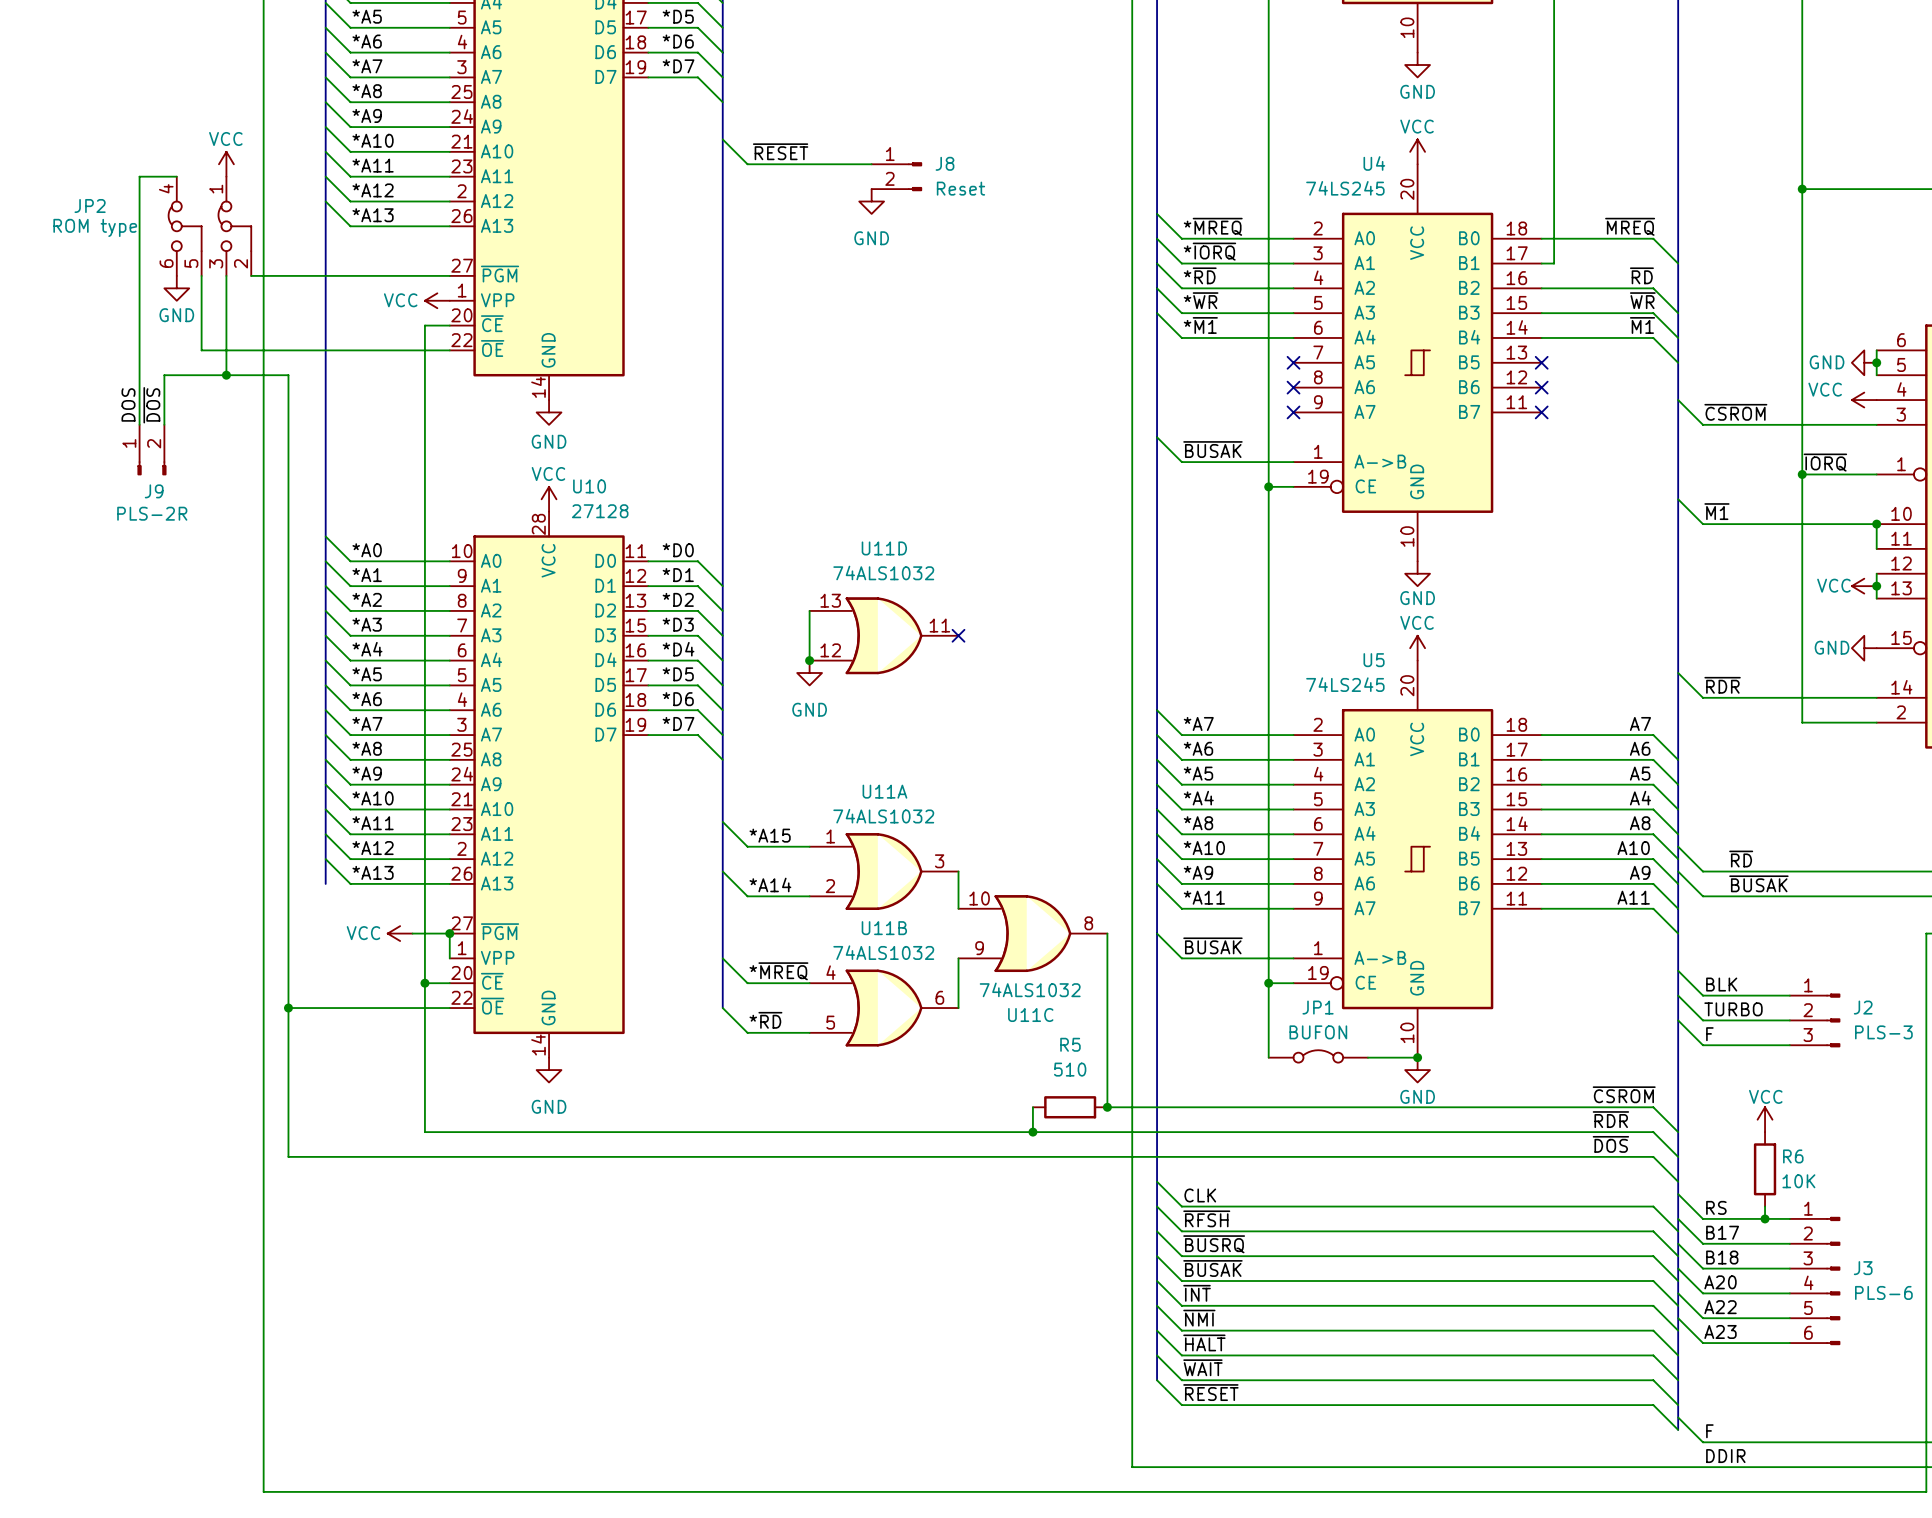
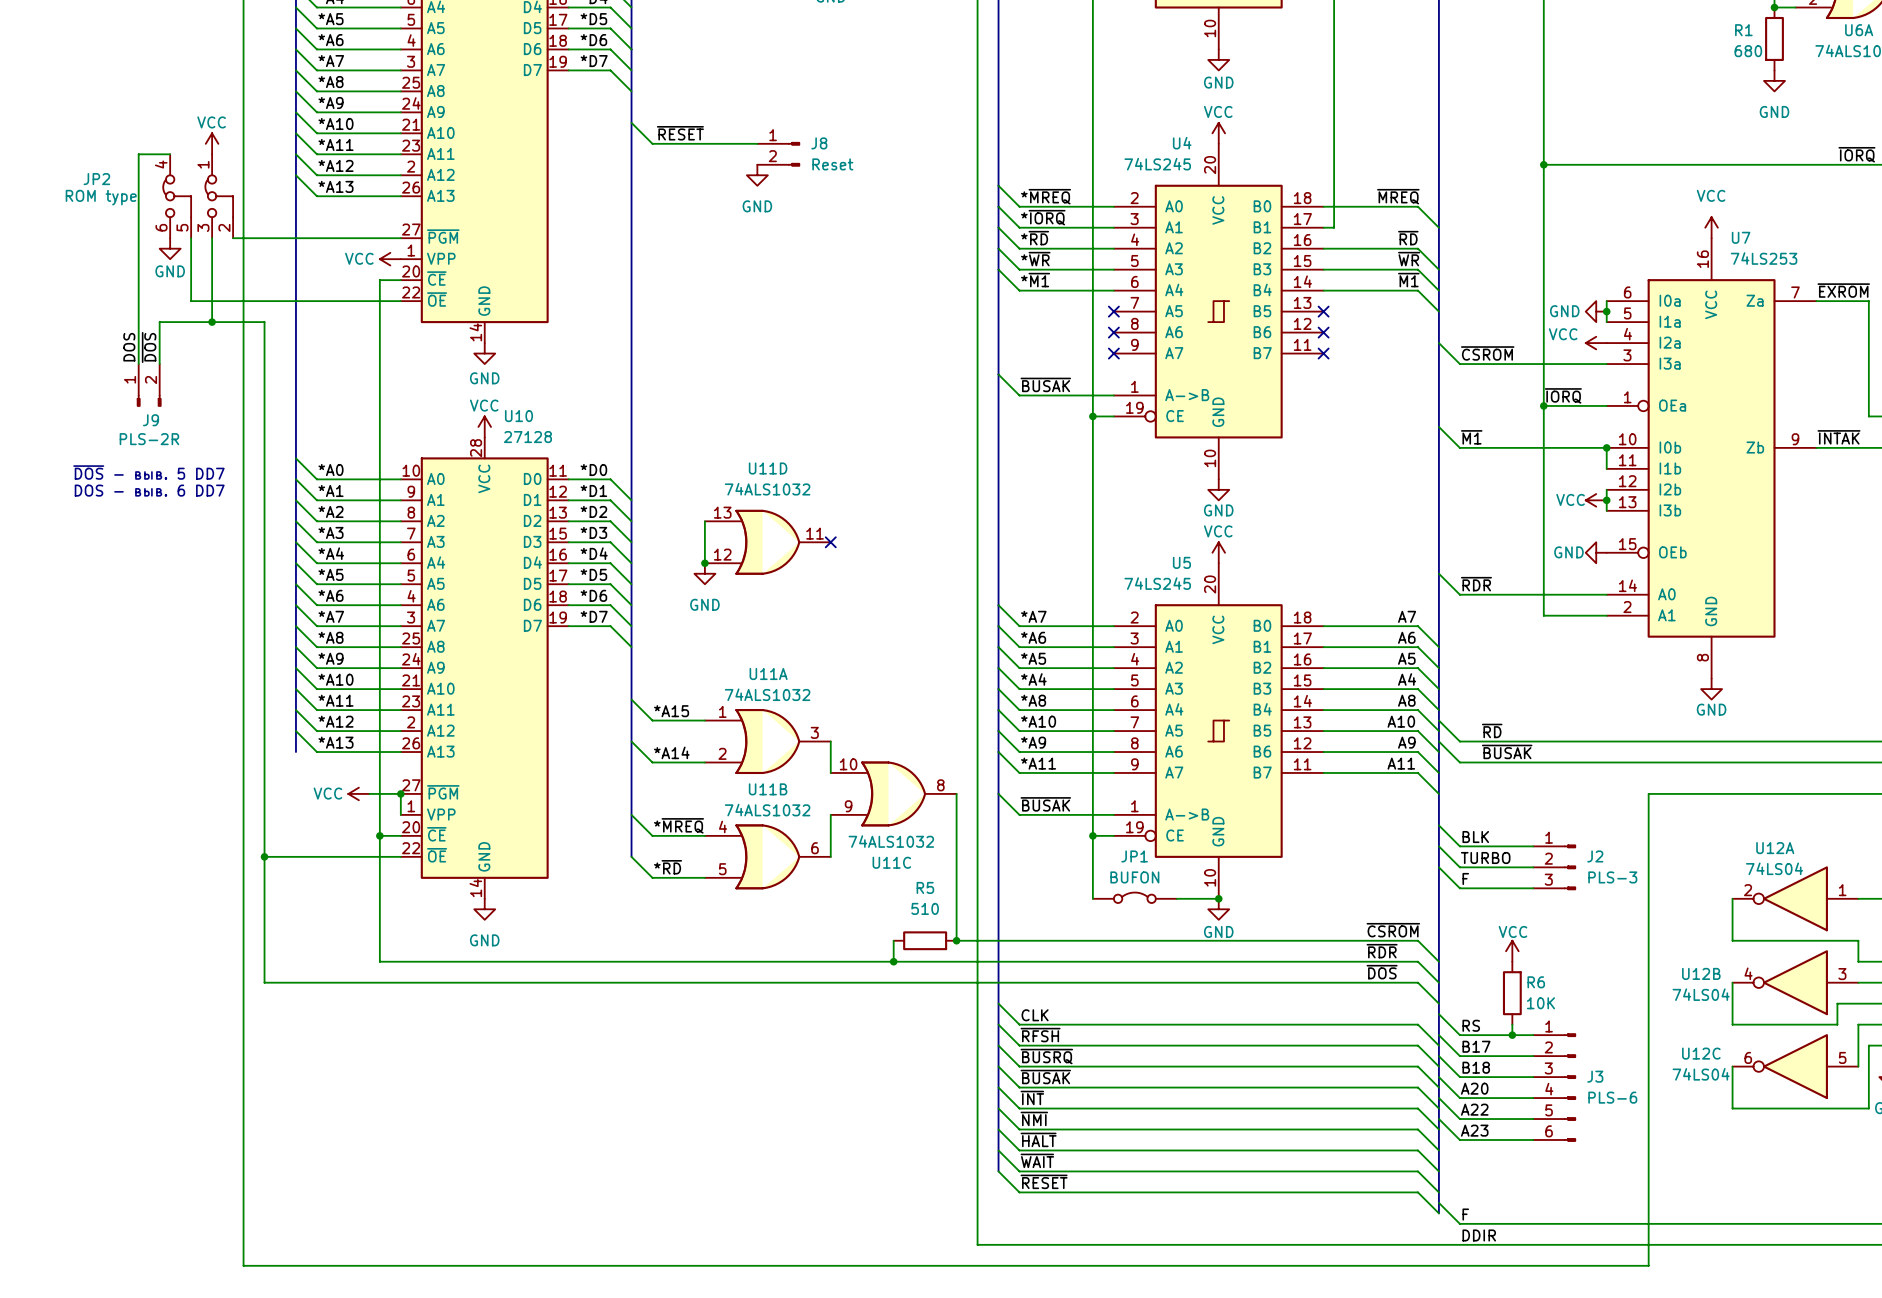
text: none -> ~{DOS} - выв. 5 DD7 (148, 472)
text: none -> DOS - выв. 6 DD7 (149, 490)

